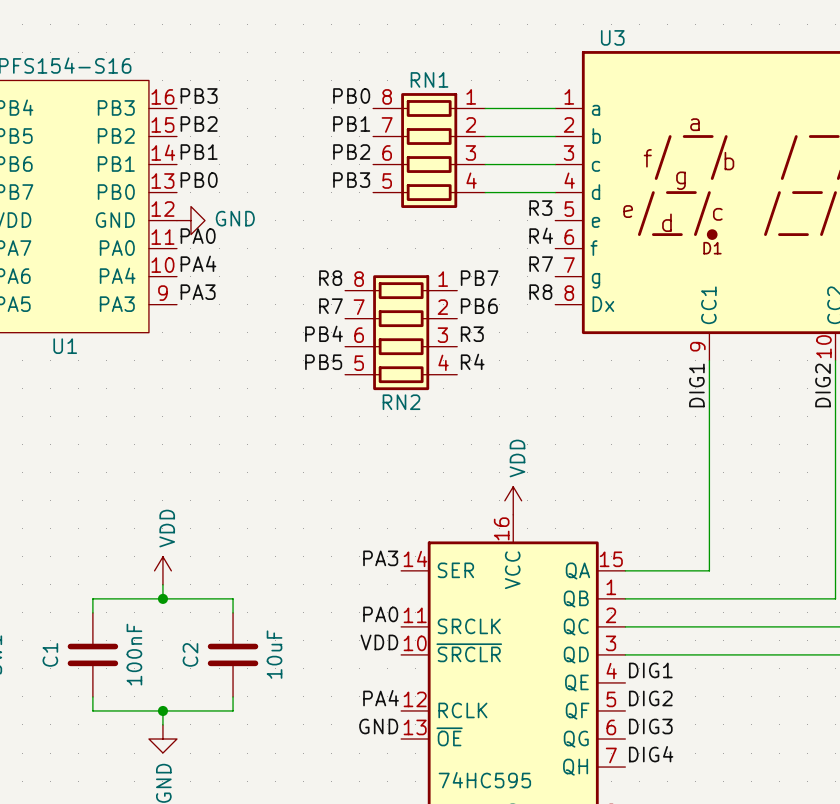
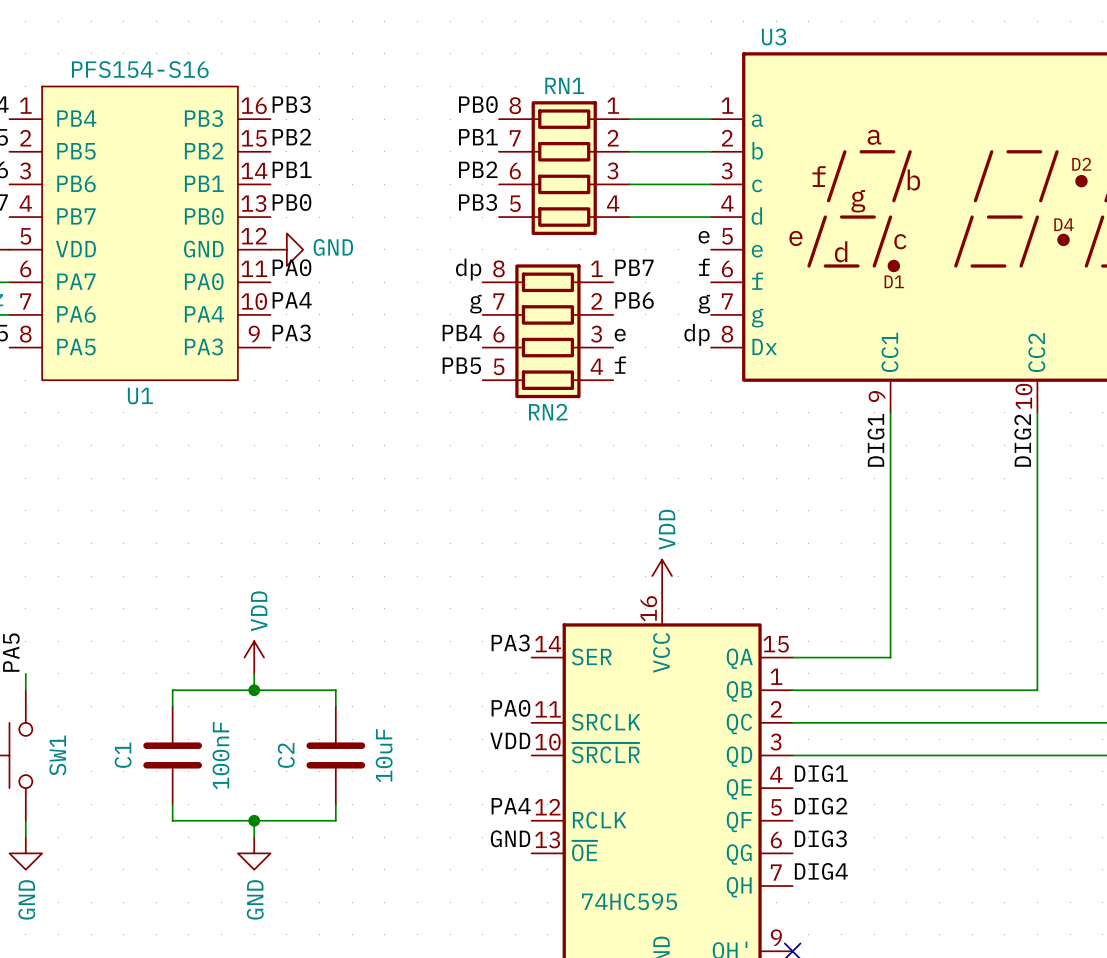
label: R3 (540, 208) -> e (704, 237)
label: R4 (541, 235) -> f (704, 267)
label: none -> dp (468, 269)
label: R7 (541, 264) -> g (704, 304)
label: none -> g (475, 304)
label: R8 (330, 278) -> none
label position: PB7 (479, 278) -> PB7 (634, 267)
label: R8 (540, 292) -> dp (697, 334)
label: none -> e (620, 335)
label: R7 (330, 306) -> none
label position: PB6 (479, 306) -> PB6 (634, 300)
label: none -> f (620, 365)
RN2 position: (401, 332) -> (547, 331)
label position: PB4 (323, 333) -> PB4 (462, 333)
label: R3 (472, 334) -> none
label: R4 (472, 361) -> none
label position: PB5 (323, 362) -> PB5 (461, 365)

